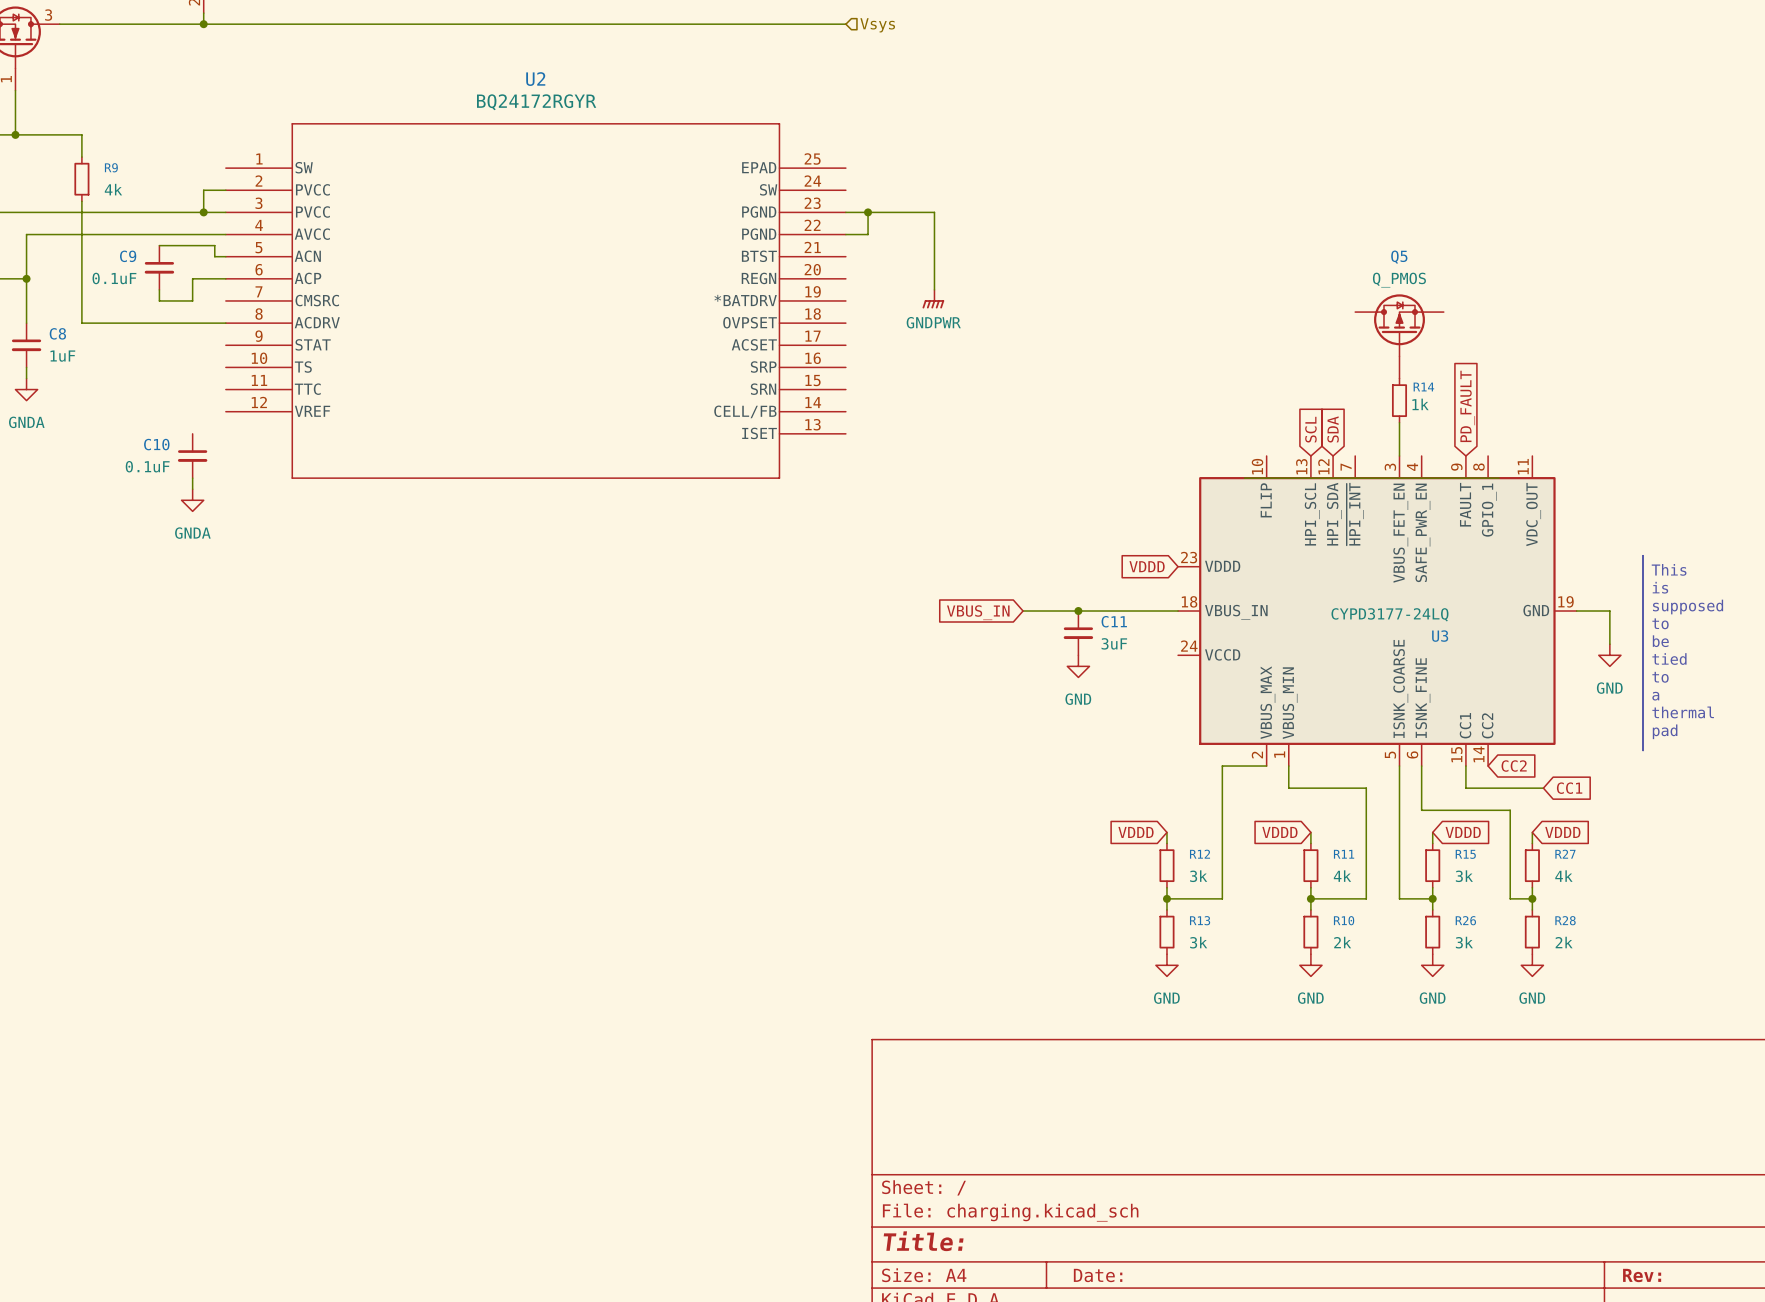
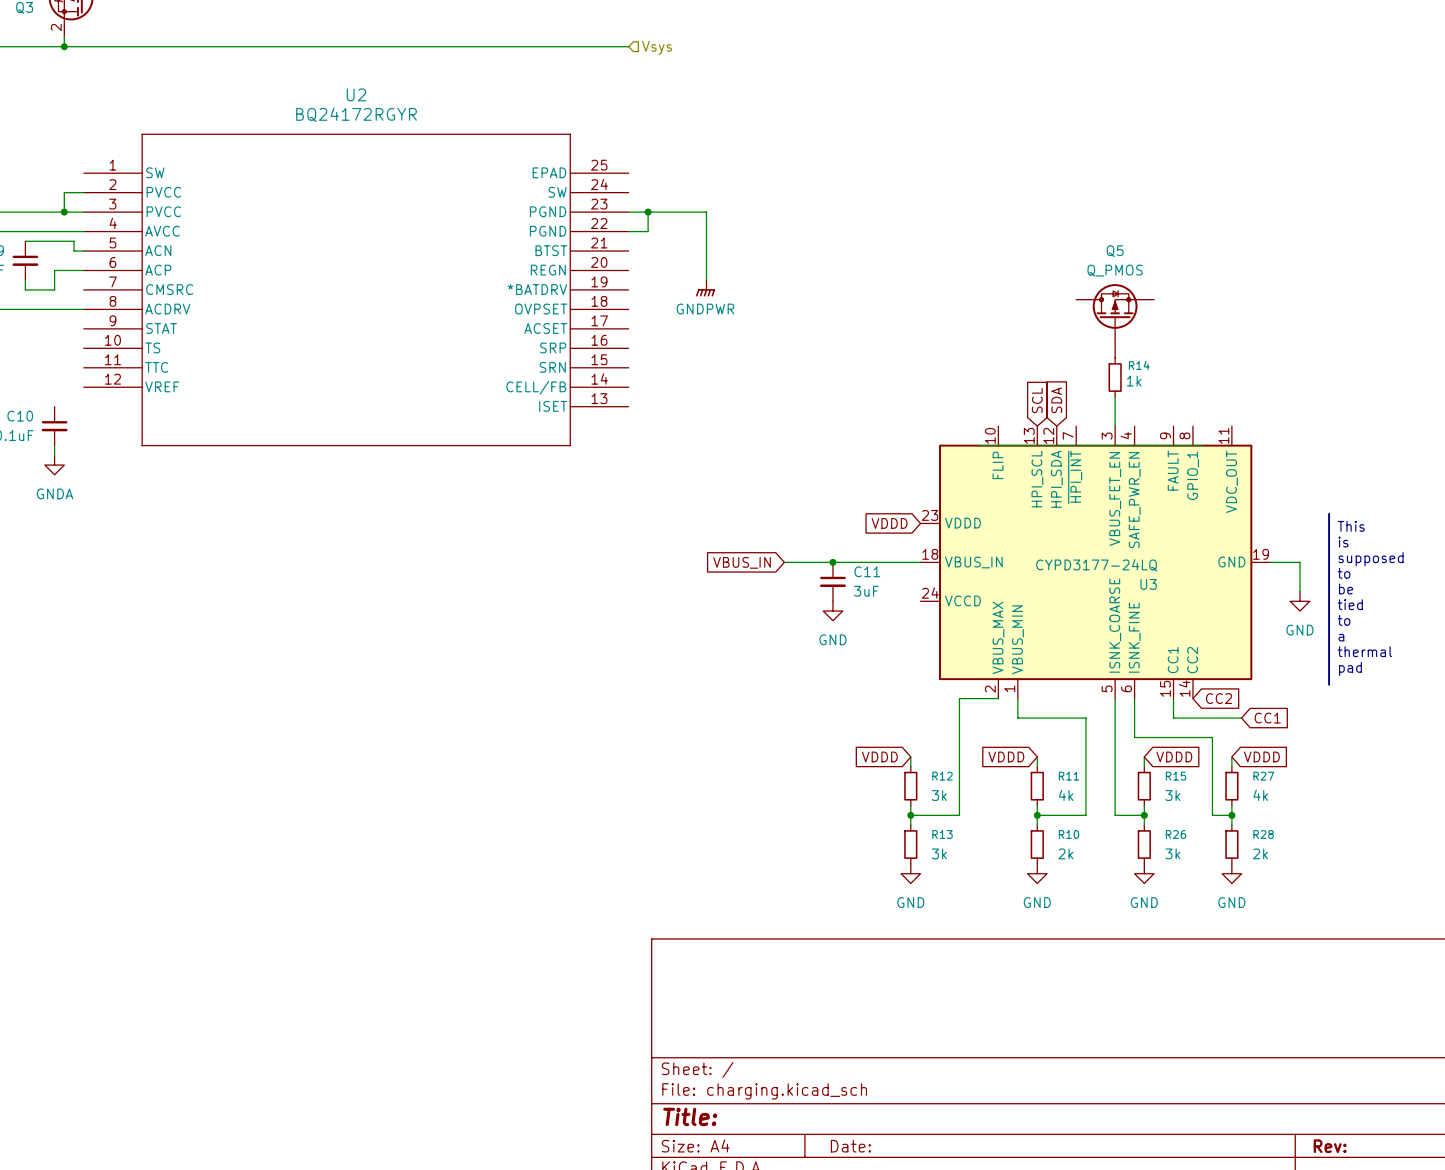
global label: PD_FAULT (1467, 406) -> none

